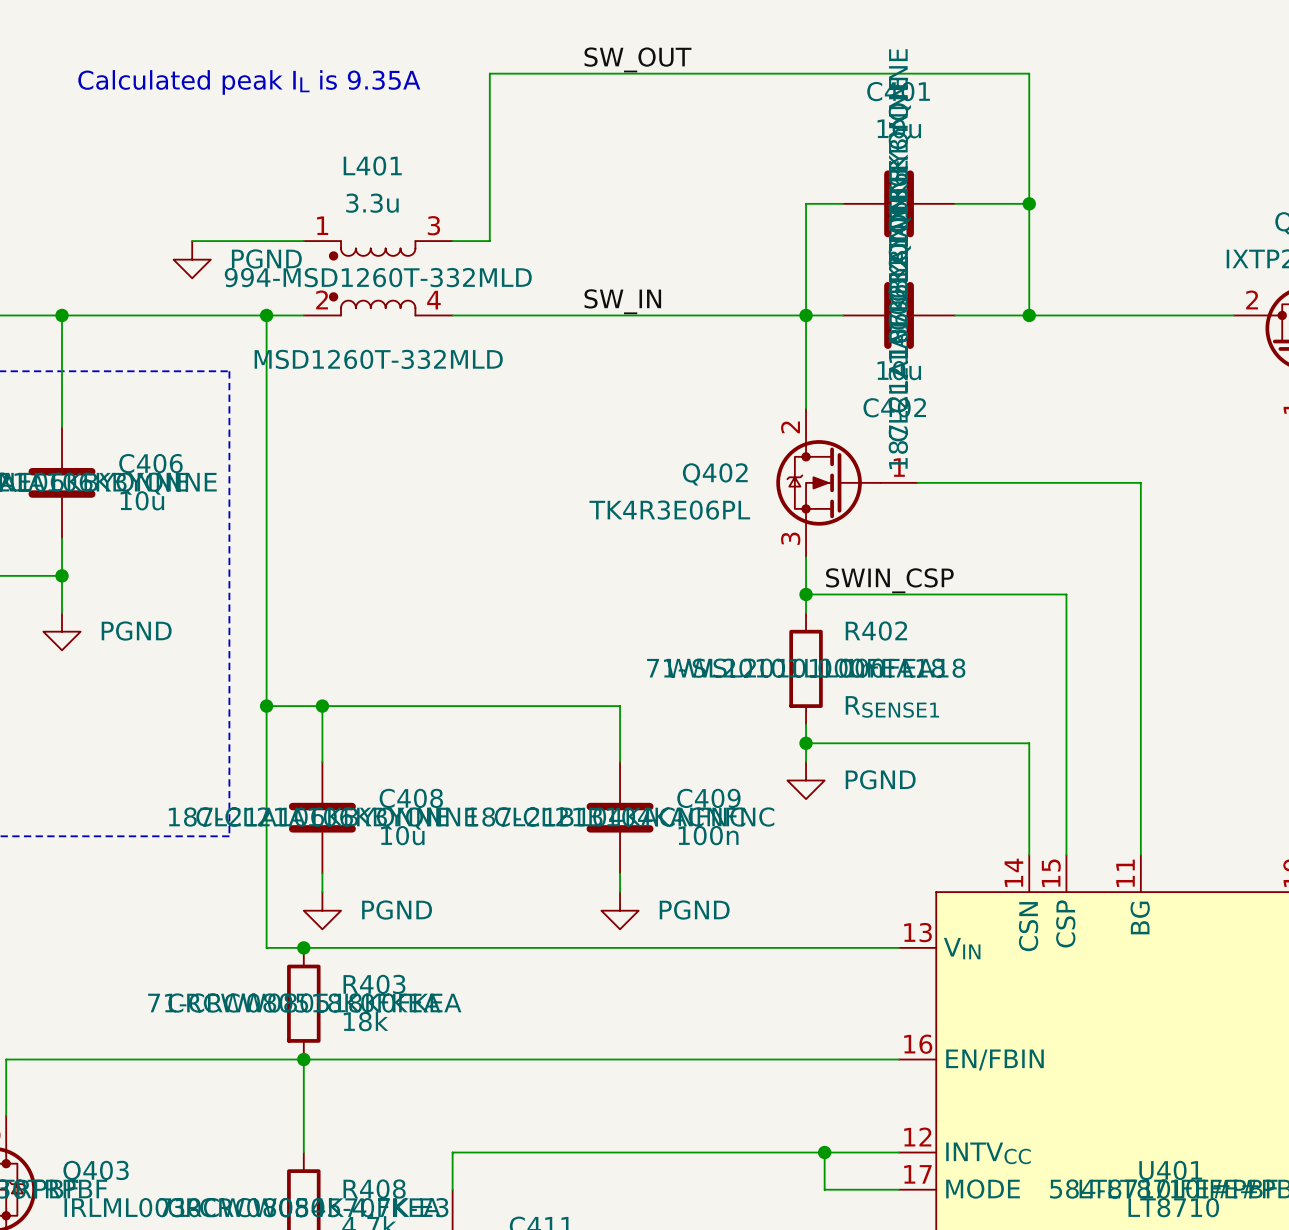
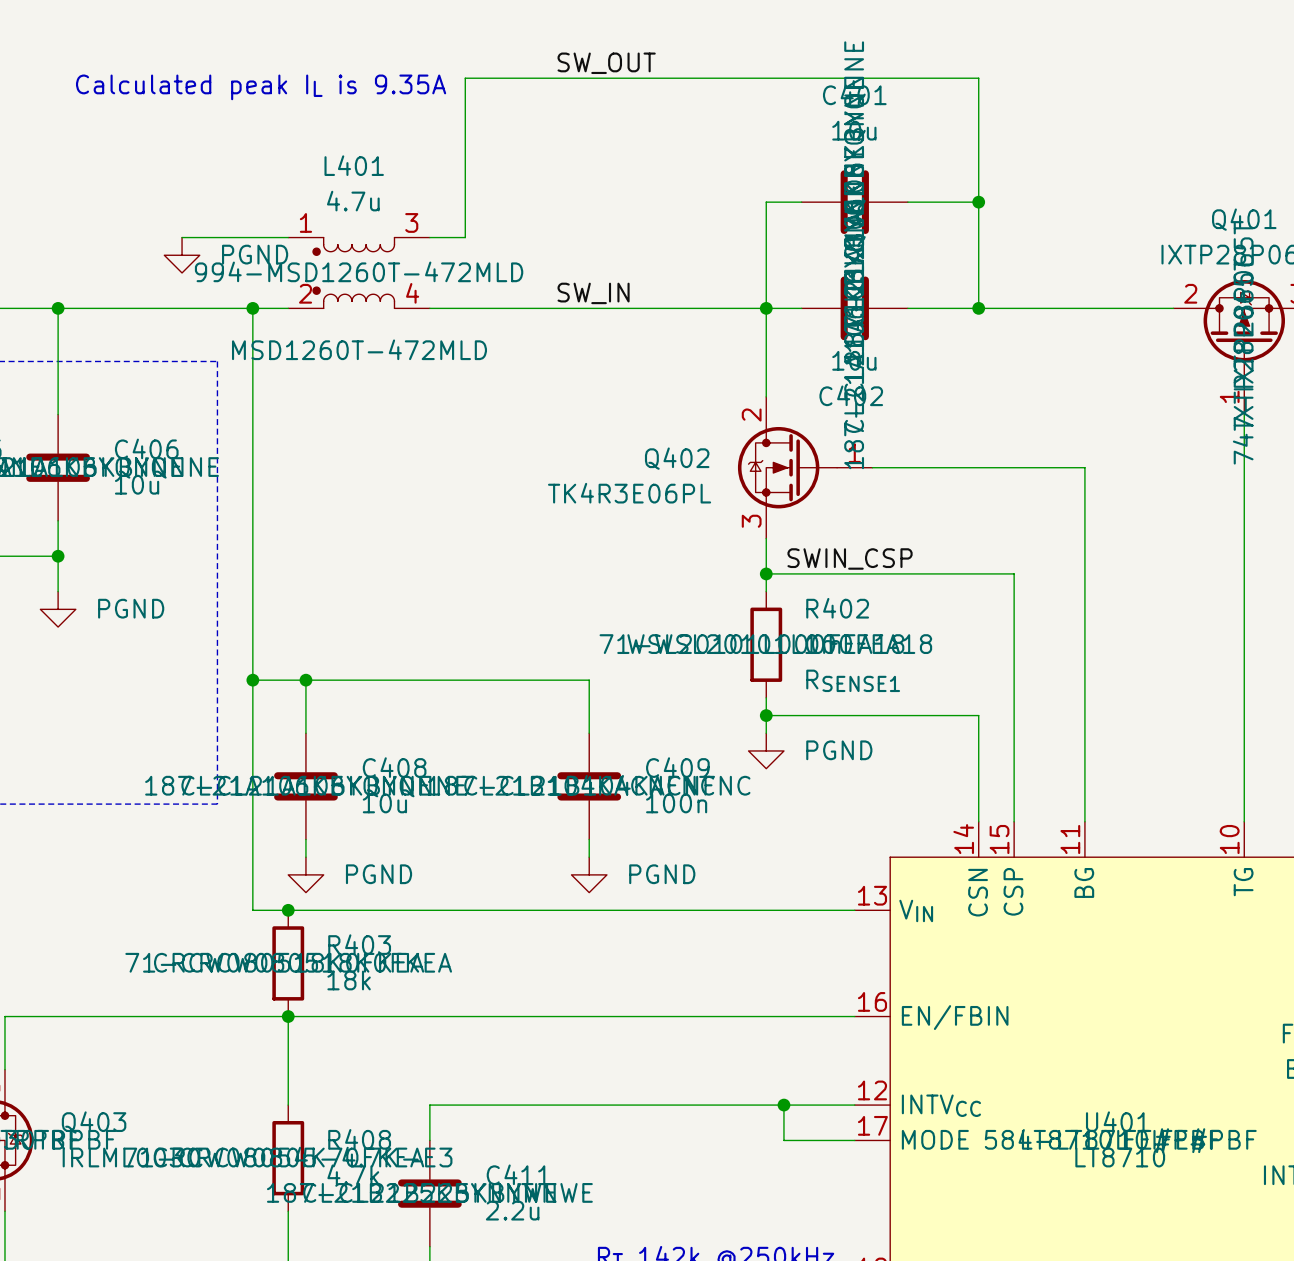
L401 value: 3.3u (372, 203) -> 4.7u (353, 201)
L401 text: 994-MSD1260T-332MLD (378, 277) -> 994-MSD1260T-472MLD (359, 271)
L401 text: MSD1260T-332MLD (378, 359) -> MSD1260T-472MLD (359, 349)

